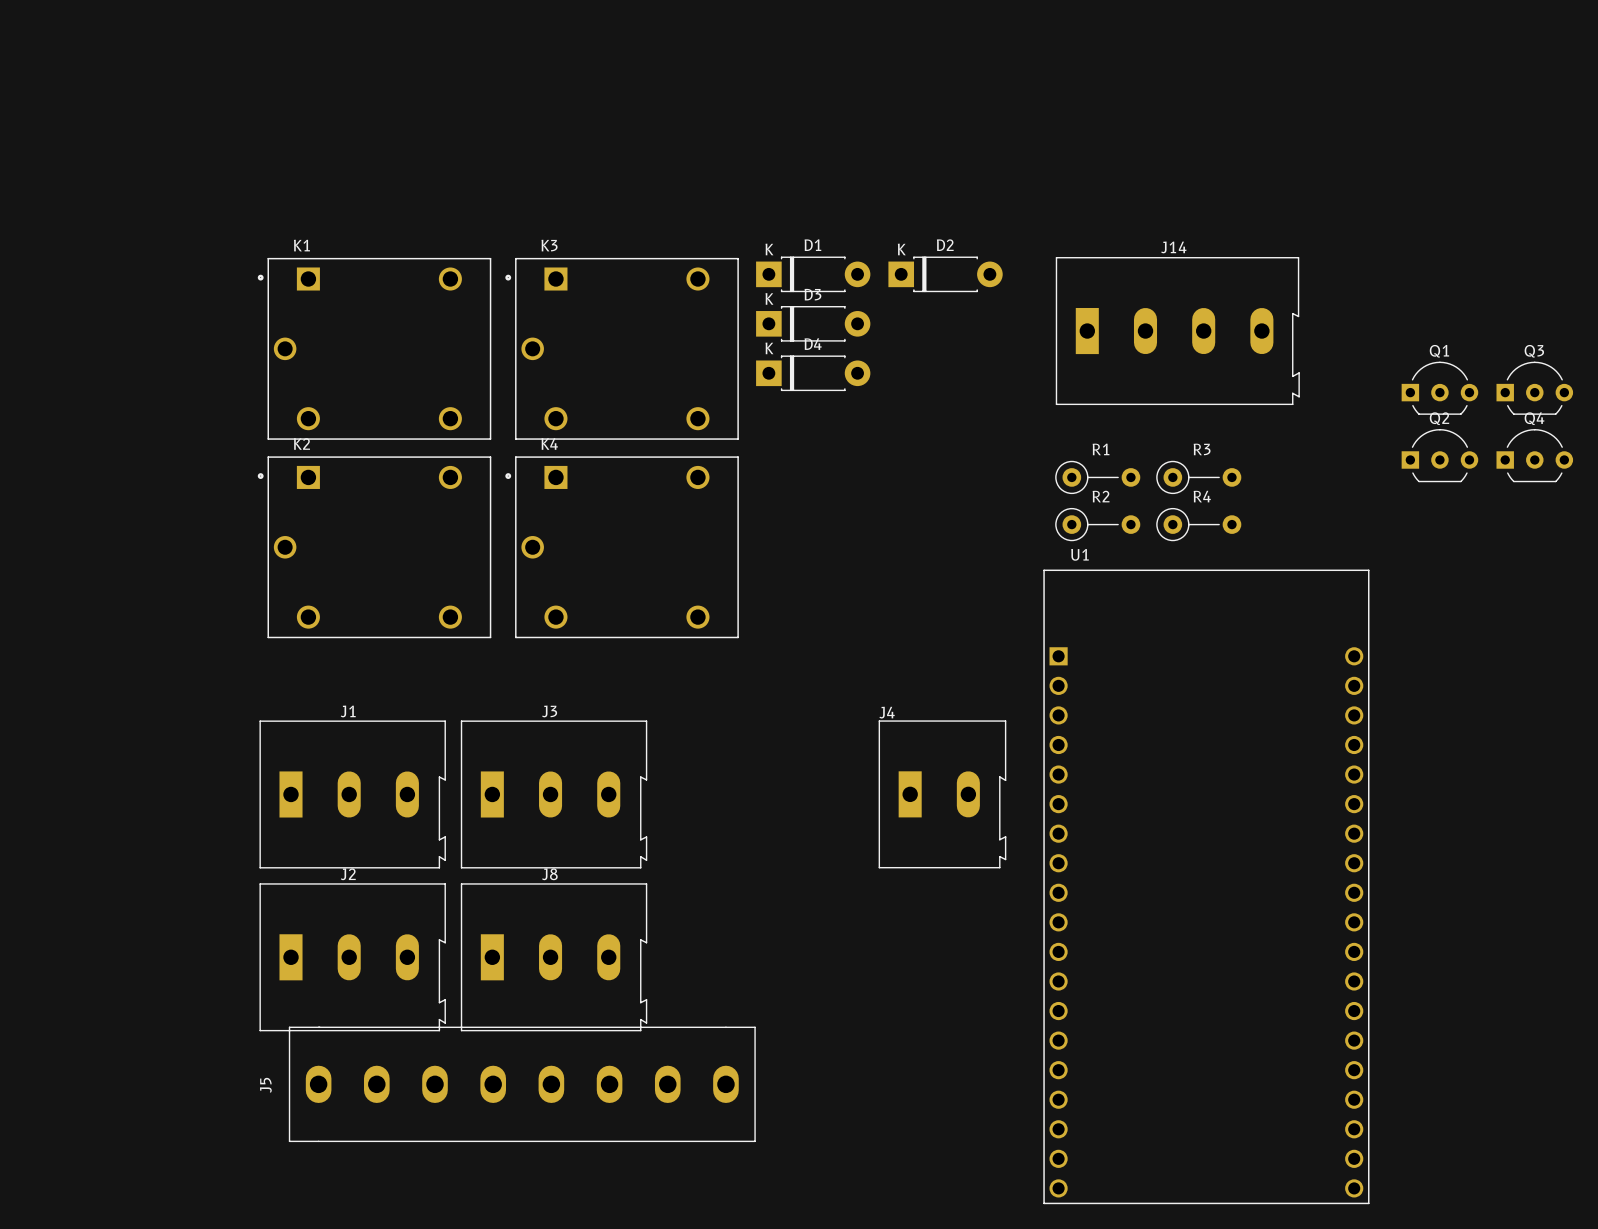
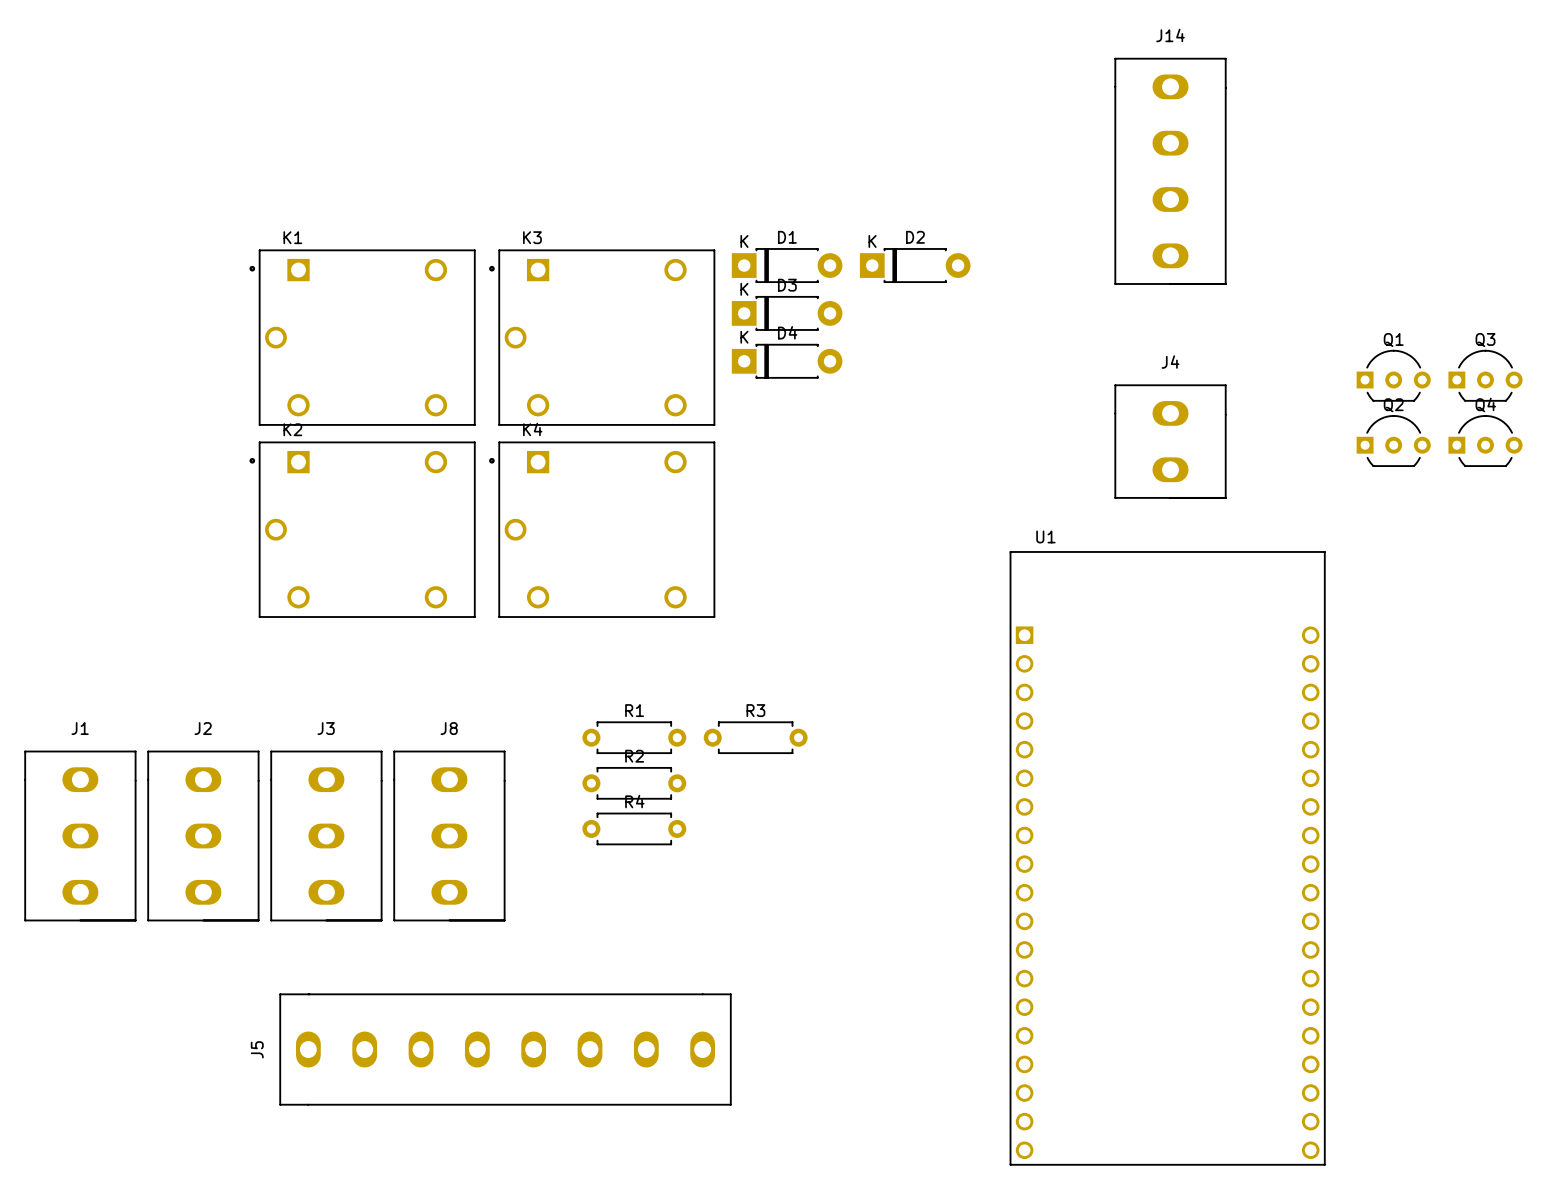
J14 name position: J14 (1173, 247) -> J14 (1170, 35)
J14 footprint: [1055, 257, 1300, 406] -> [1114, 58, 1227, 285]
R1 footprint: [1055, 460, 1141, 495] -> [582, 721, 687, 754]
R3 footprint: [1156, 460, 1242, 495] -> [703, 721, 808, 754]
R2 footprint: [1055, 507, 1141, 542] -> [582, 767, 687, 800]
R4 footprint: [1156, 507, 1242, 542] -> [582, 812, 687, 846]
J1 name position: J1 (348, 711) -> J1 (80, 728)
J3 name position: J3 (549, 711) -> J3 (326, 728)
J4 name position: J4 (887, 712) -> J4 (1170, 362)
J1 footprint: [259, 720, 446, 869] -> [24, 750, 137, 922]
J3 footprint: [460, 720, 648, 869] -> [270, 750, 383, 922]
J4 footprint: [878, 720, 1007, 869] -> [1114, 384, 1227, 499]
J2 name position: J2 (348, 874) -> J2 (203, 728)
J8 name position: J8 (549, 874) -> J8 (449, 728)
J2 footprint: [259, 883, 446, 1032] -> [147, 750, 260, 922]
J8 footprint: [460, 883, 648, 1032] -> [393, 750, 506, 922]

